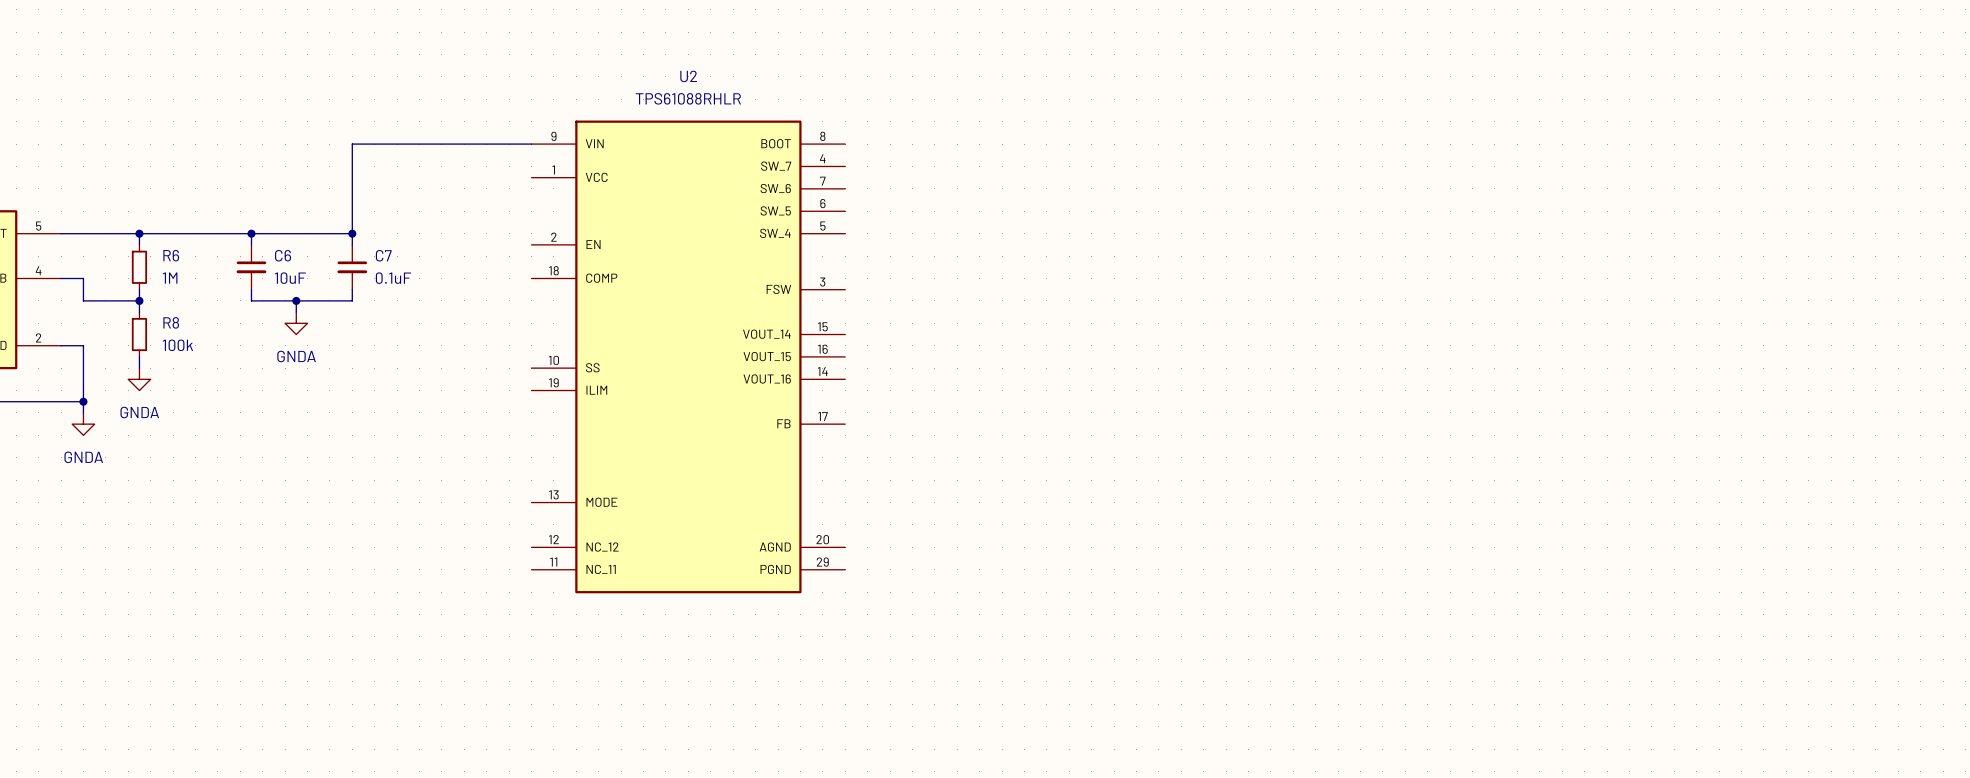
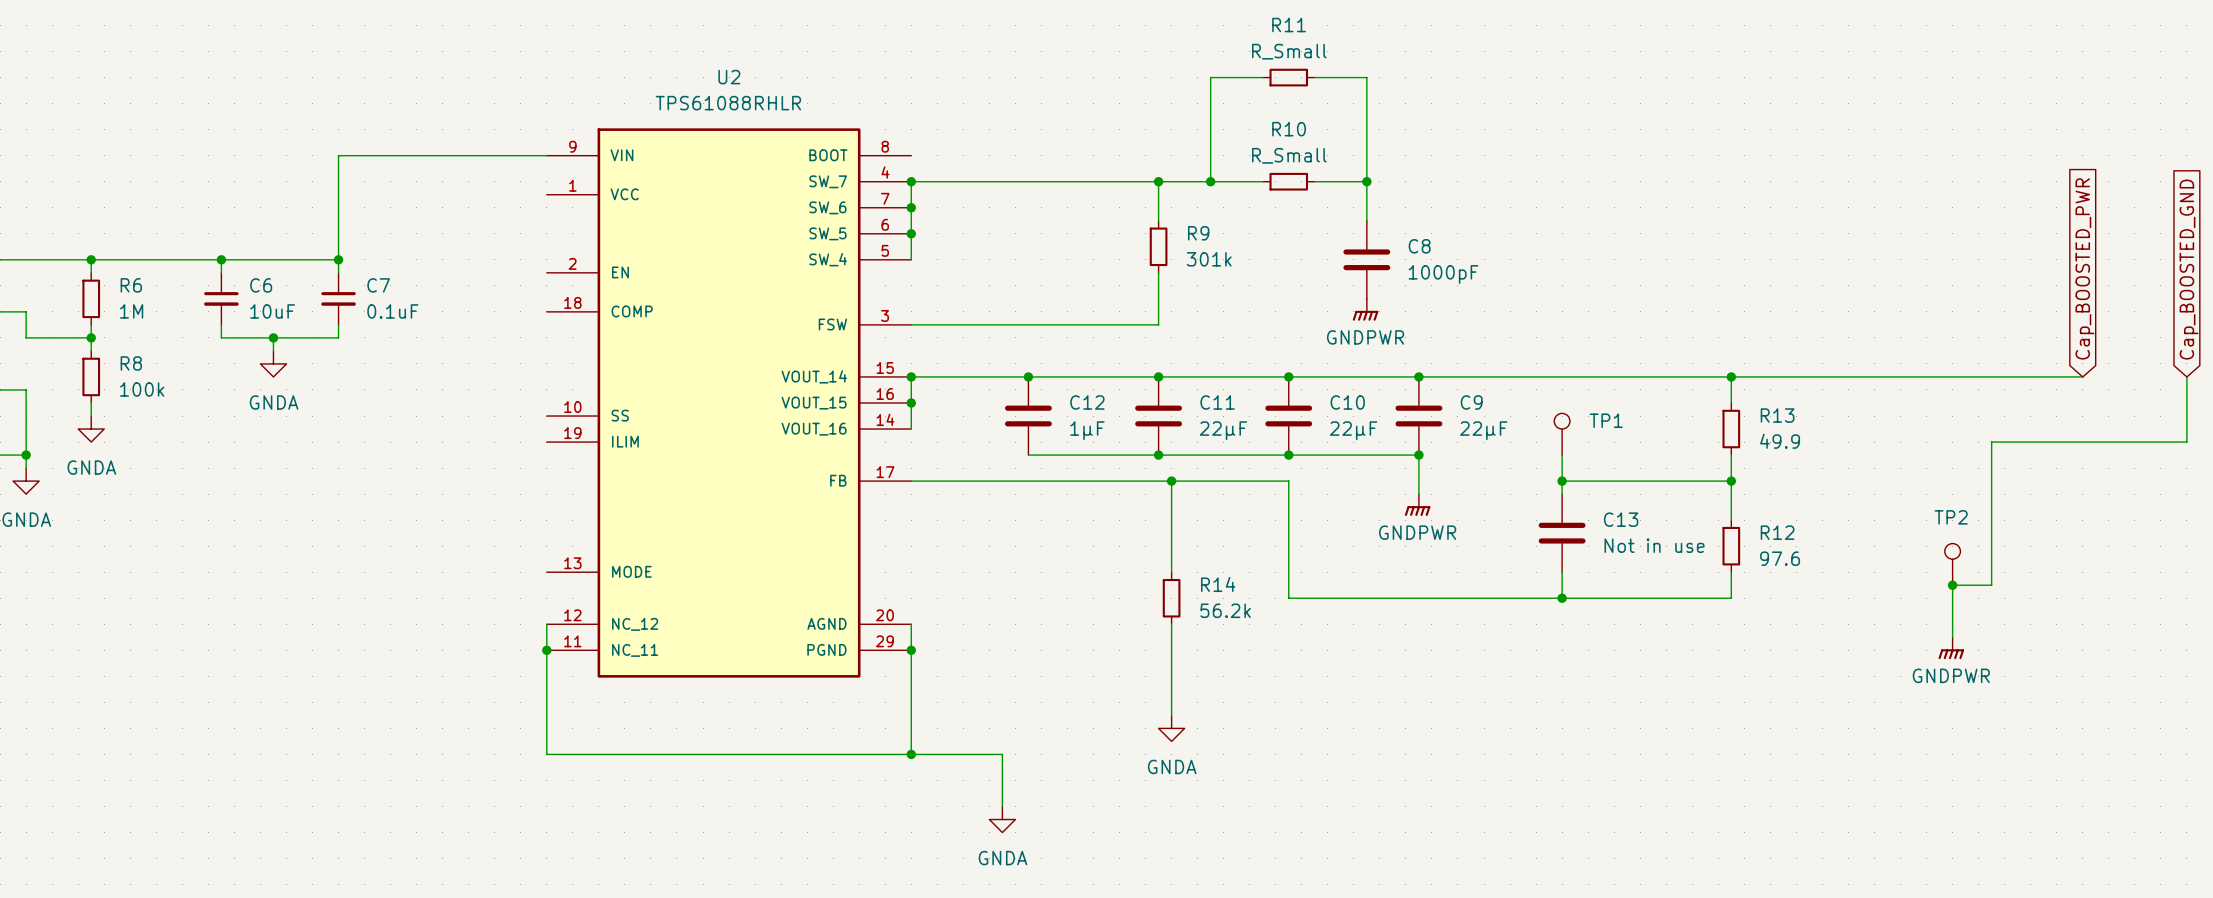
wire: none -> (1262, 77) (1210, 77) (1210, 181)
R11: none -> R_Small (1288, 77)
wire: none -> (1314, 77) (1366, 77) (1366, 220)
junction: none -> (911, 181)
wire: none -> (1158, 181) (1158, 220)
junction: none -> (1158, 181)
junction: none -> (1210, 181)
wire: none -> (1262, 181) (911, 181) (911, 259)
R10: none -> R_Small (1288, 181)
wire: none -> (1314, 181) (1366, 181)
junction: none -> (1366, 181)
junction: none -> (911, 207)
junction: none -> (911, 233)
R9: none -> 301k (1158, 246)
C8: none -> 1000pF (1366, 259)
wire: none -> (1158, 272) (1158, 324) (911, 324)
global label: none -> Cap_BOOSTED_PWR (2084, 268)
global label: none -> Cap_BOOSTED_GND (2189, 269)
power symbol: none -> GNDPWR (1365, 309)
junction: none -> (911, 376)
junction: none -> (1028, 376)
junction: none -> (1158, 376)
junction: none -> (1288, 376)
junction: none -> (1418, 376)
wire: none -> (1731, 376) (1731, 402)
junction: none -> (1731, 376)
wire: none -> (2082, 376) (911, 376) (911, 429)
wire: none -> (2186, 376) (2186, 442) (1991, 442) (1991, 585) (1952, 585) (1952, 637)
junction: none -> (911, 402)
C12: none -> 1µF (1028, 416)
C11: none -> 22µF (1158, 416)
C10: none -> 22µF (1288, 416)
C9: none -> 22µF (1418, 416)
R13: none -> 49.9 (1731, 429)
TP1: none -> (1562, 434)
wire: none -> (1028, 455) (1418, 455) (1418, 494)
junction: none -> (1158, 455)
junction: none -> (1288, 455)
junction: none -> (1418, 455)
wire: none -> (1562, 455) (1562, 494)
wire: none -> (1731, 455) (1731, 520)
wire: none -> (911, 481) (1288, 481) (1288, 598) (1731, 598) (1731, 572)
wire: none -> (1171, 481) (1171, 572)
junction: none -> (1171, 481)
wire: none -> (1562, 481) (1731, 481)
junction: none -> (1562, 481)
junction: none -> (1731, 481)
power symbol: none -> GNDPWR (1417, 505)
C13: none -> Not in use (1562, 533)
R12: none -> 97.6 (1731, 546)
TP2: none -> (1952, 564)
wire: none -> (1562, 572) (1562, 598)
junction: none -> (1952, 585)
R14: none -> 56.2k (1171, 598)
junction: none -> (1562, 598)
wire: none -> (546, 624) (546, 754) (1002, 754) (1002, 806)
wire: none -> (911, 624) (911, 754)
wire: none -> (1171, 624) (1171, 715)
power symbol: none -> GNDPWR (1951, 648)
junction: none -> (546, 650)
junction: none -> (911, 650)
power symbol: none -> GNDA (1171, 728)
junction: none -> (911, 754)
power symbol: none -> GNDA (1002, 819)

